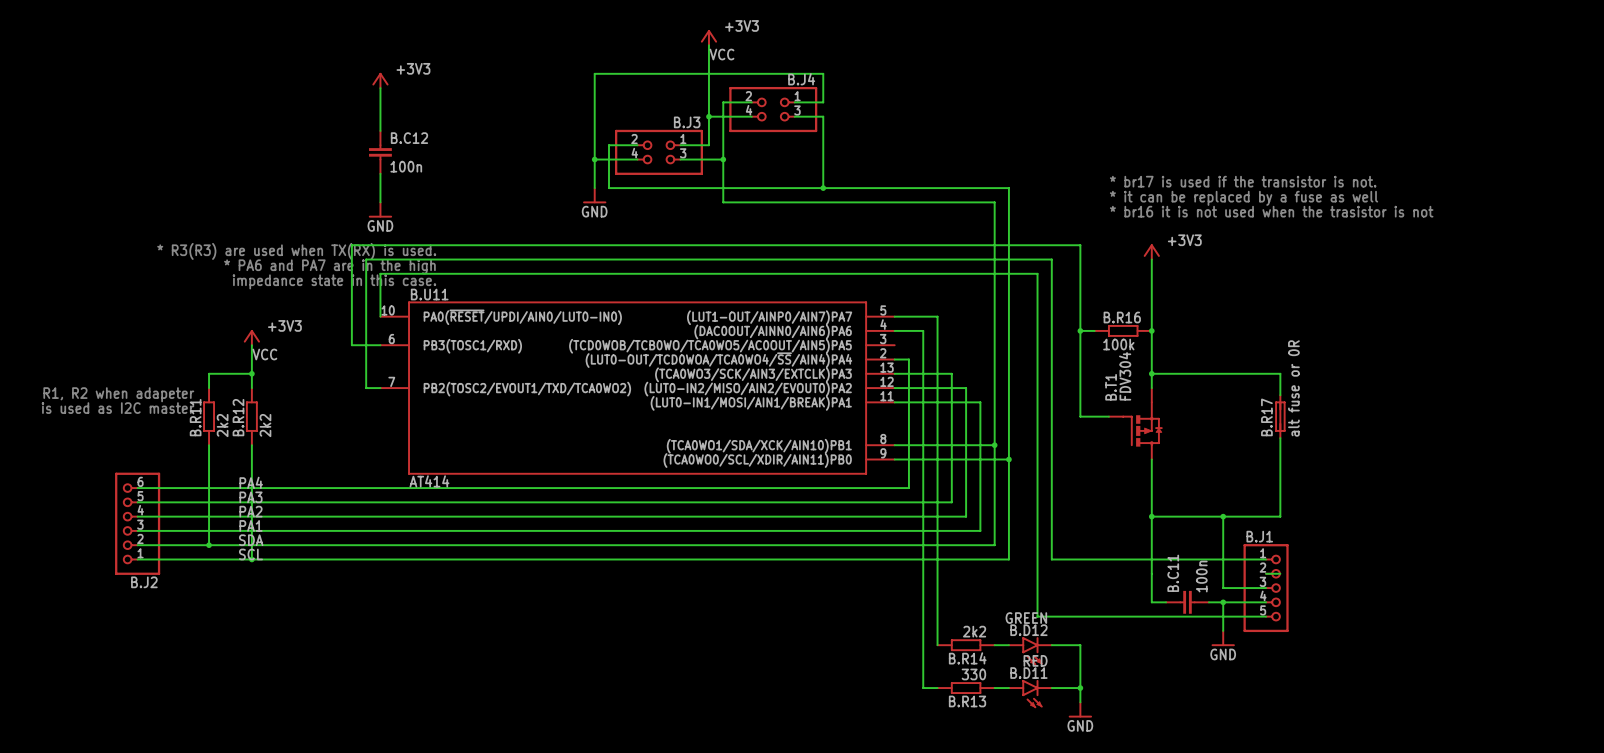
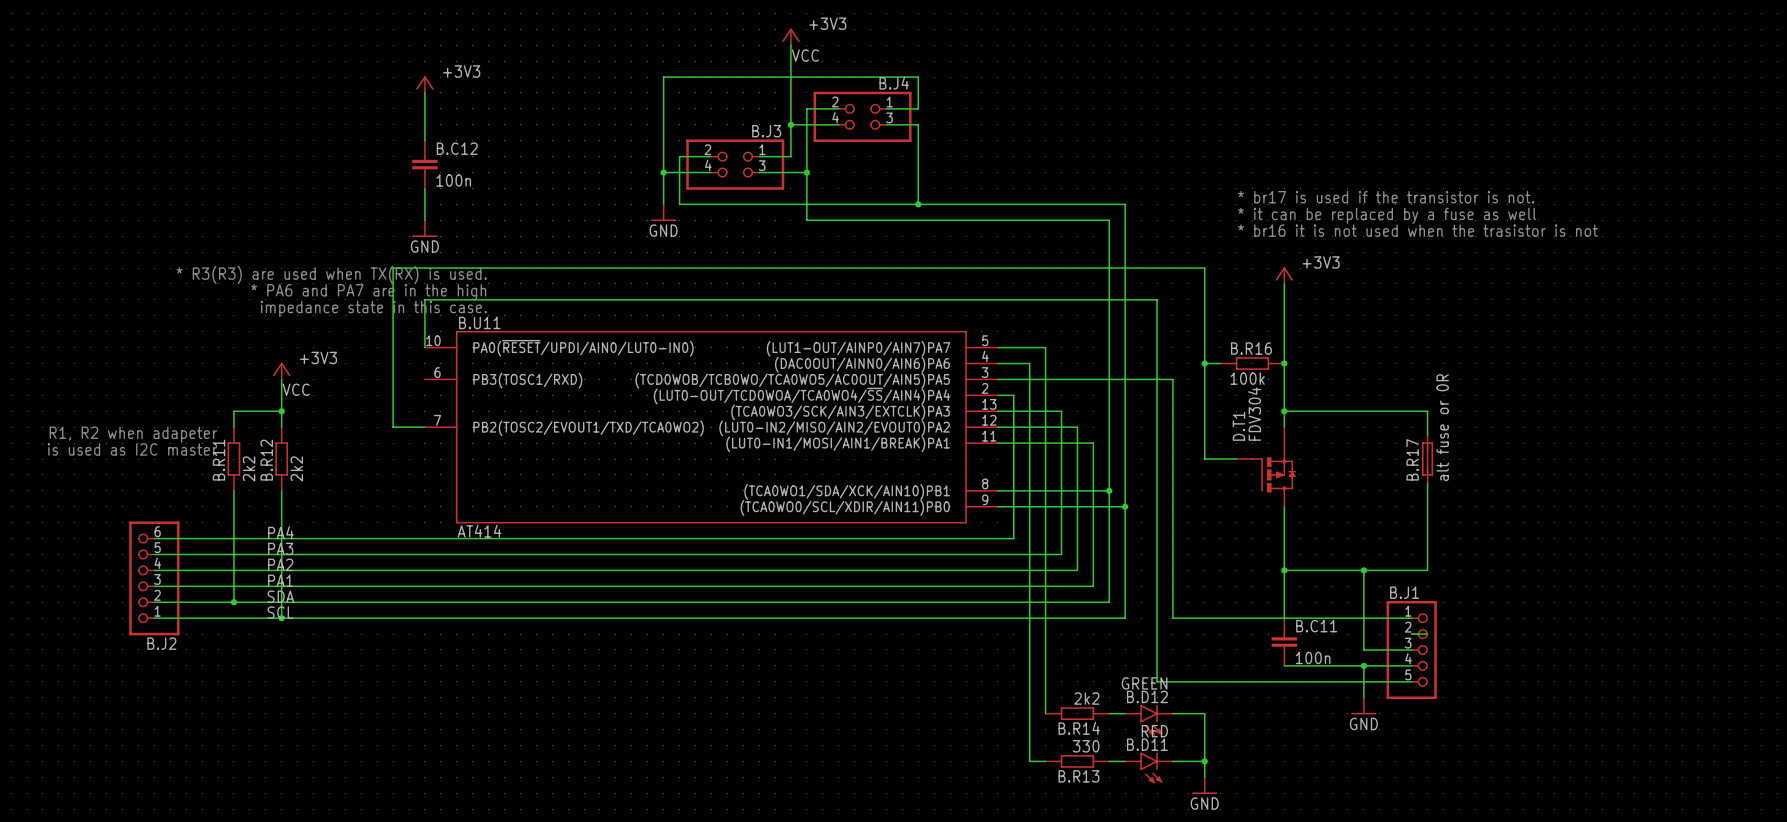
wire: (351, 345) (380, 345) -> (393, 379) (393, 427) (409, 427)
wire: (1051, 345) (1051, 259) (366, 259) (366, 388) -> (1172, 379) (997, 379)
B.T1 name: B.T1 (1111, 387) -> D.T1 (1238, 426)
B.C11 rotation: 0° (1187, 602) -> 90° clockwise (1284, 642)
B.C11 position: (1187, 602) -> (1284, 642)

